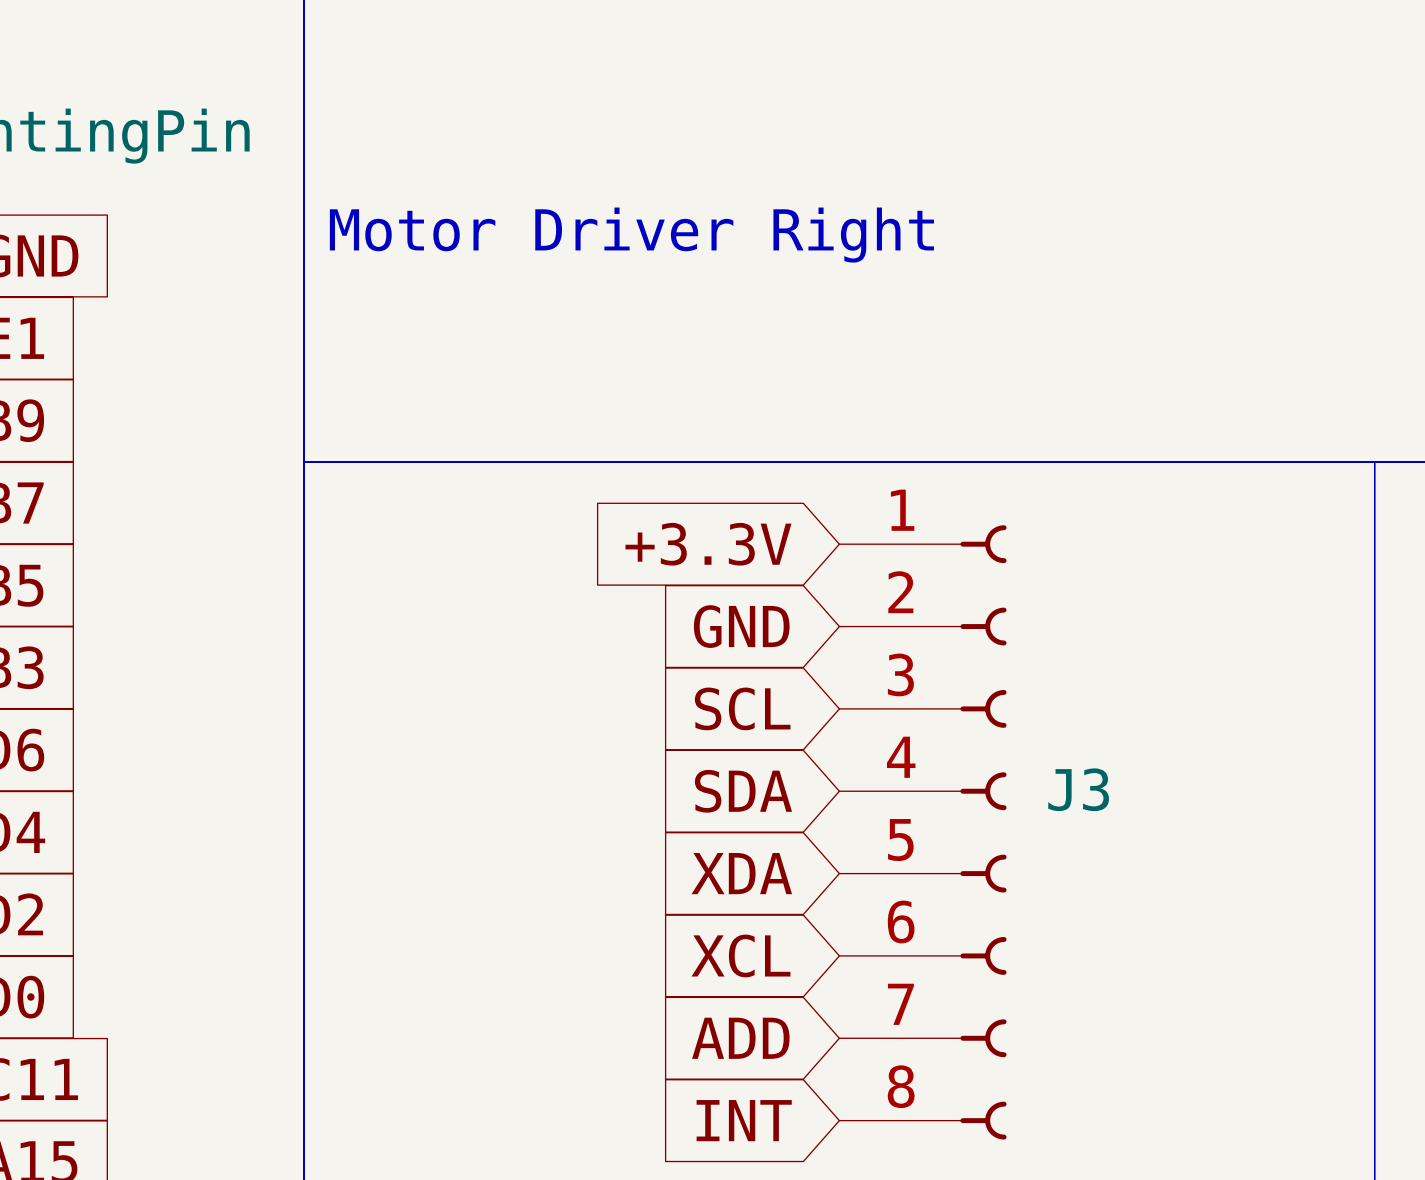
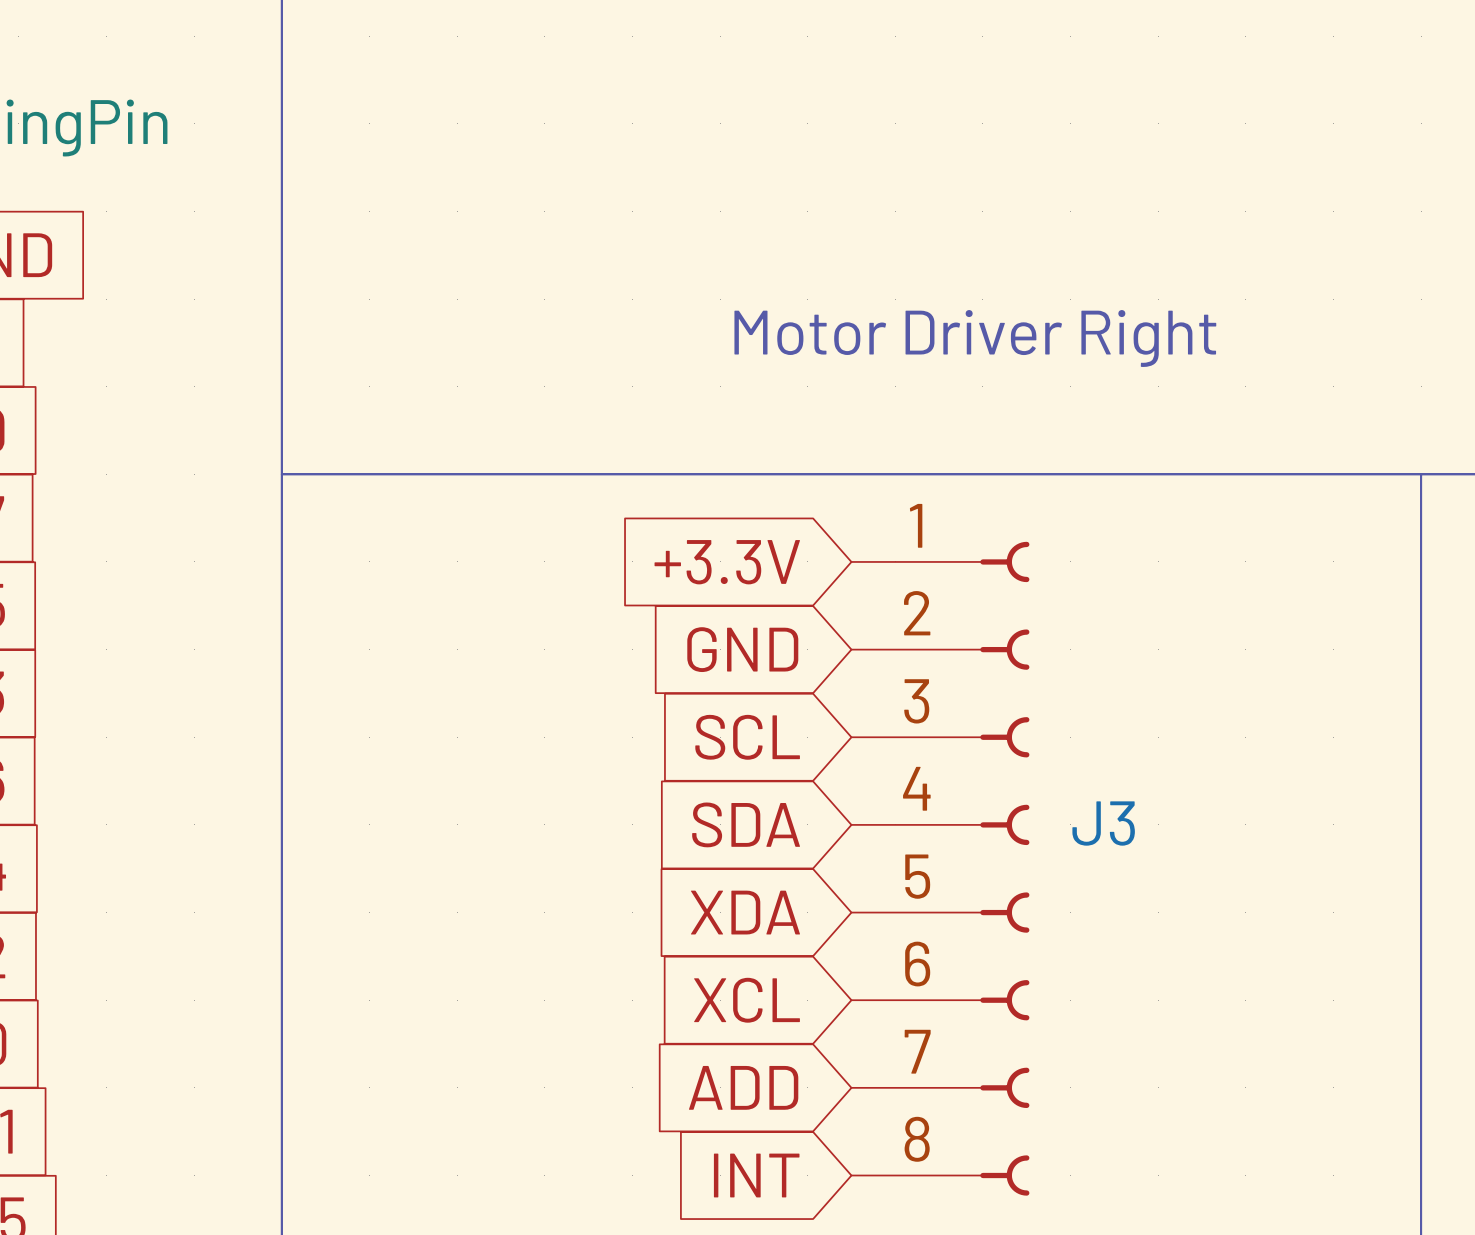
text position: Motor Driver Right (631, 235) -> Motor Driver Right (975, 338)

